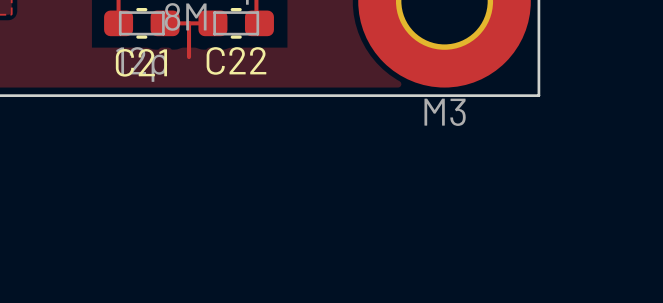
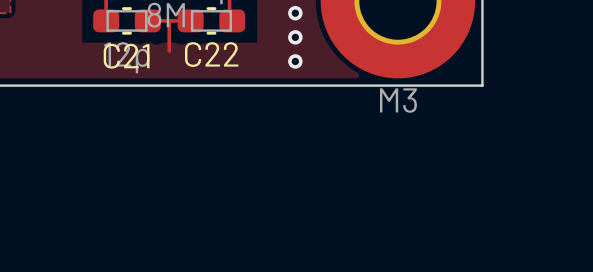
via: none -> (295, 13)
via: none -> (295, 37)
via: none -> (295, 61)

